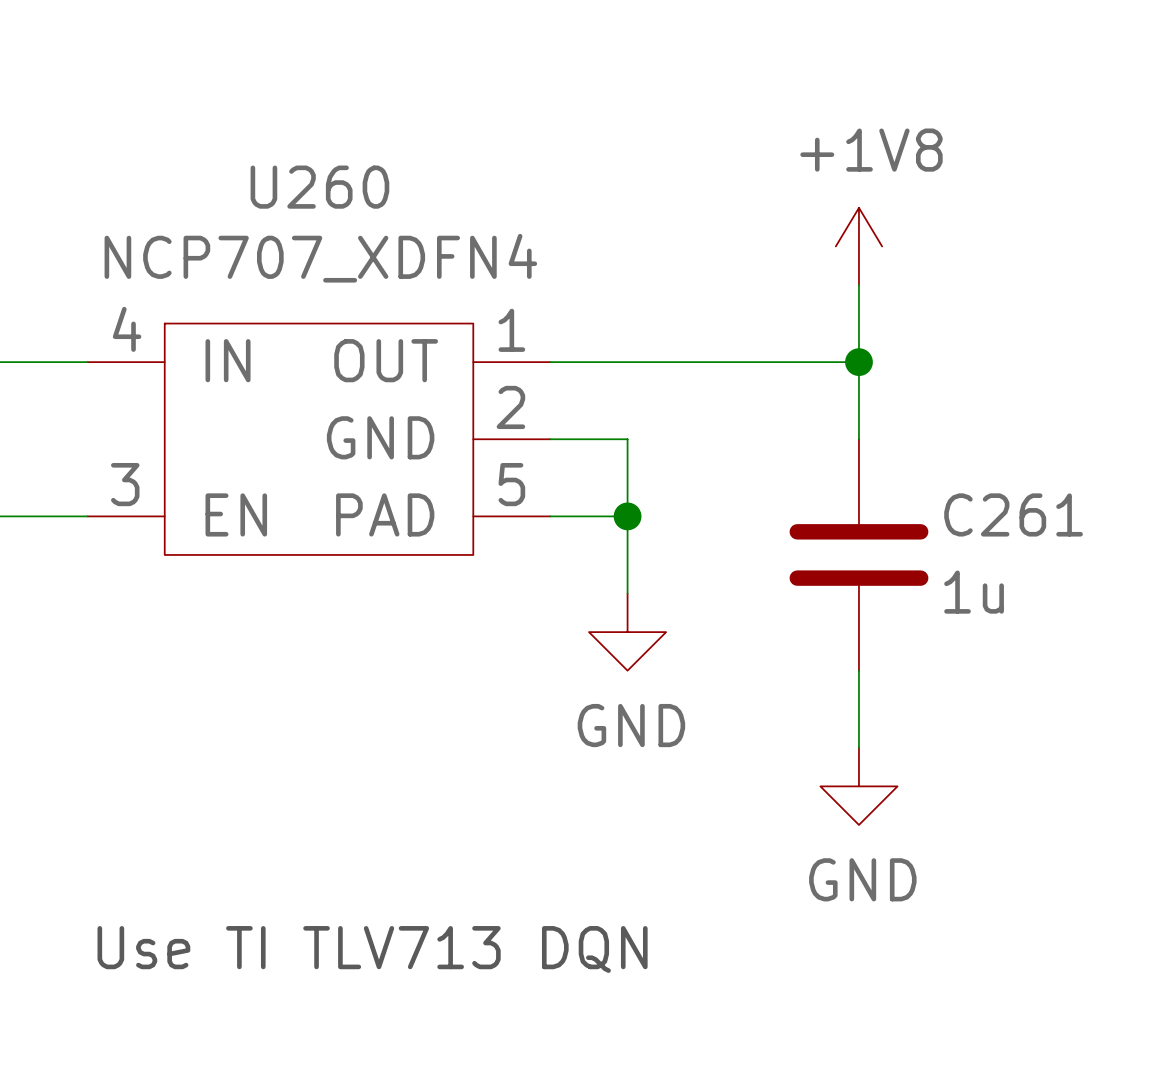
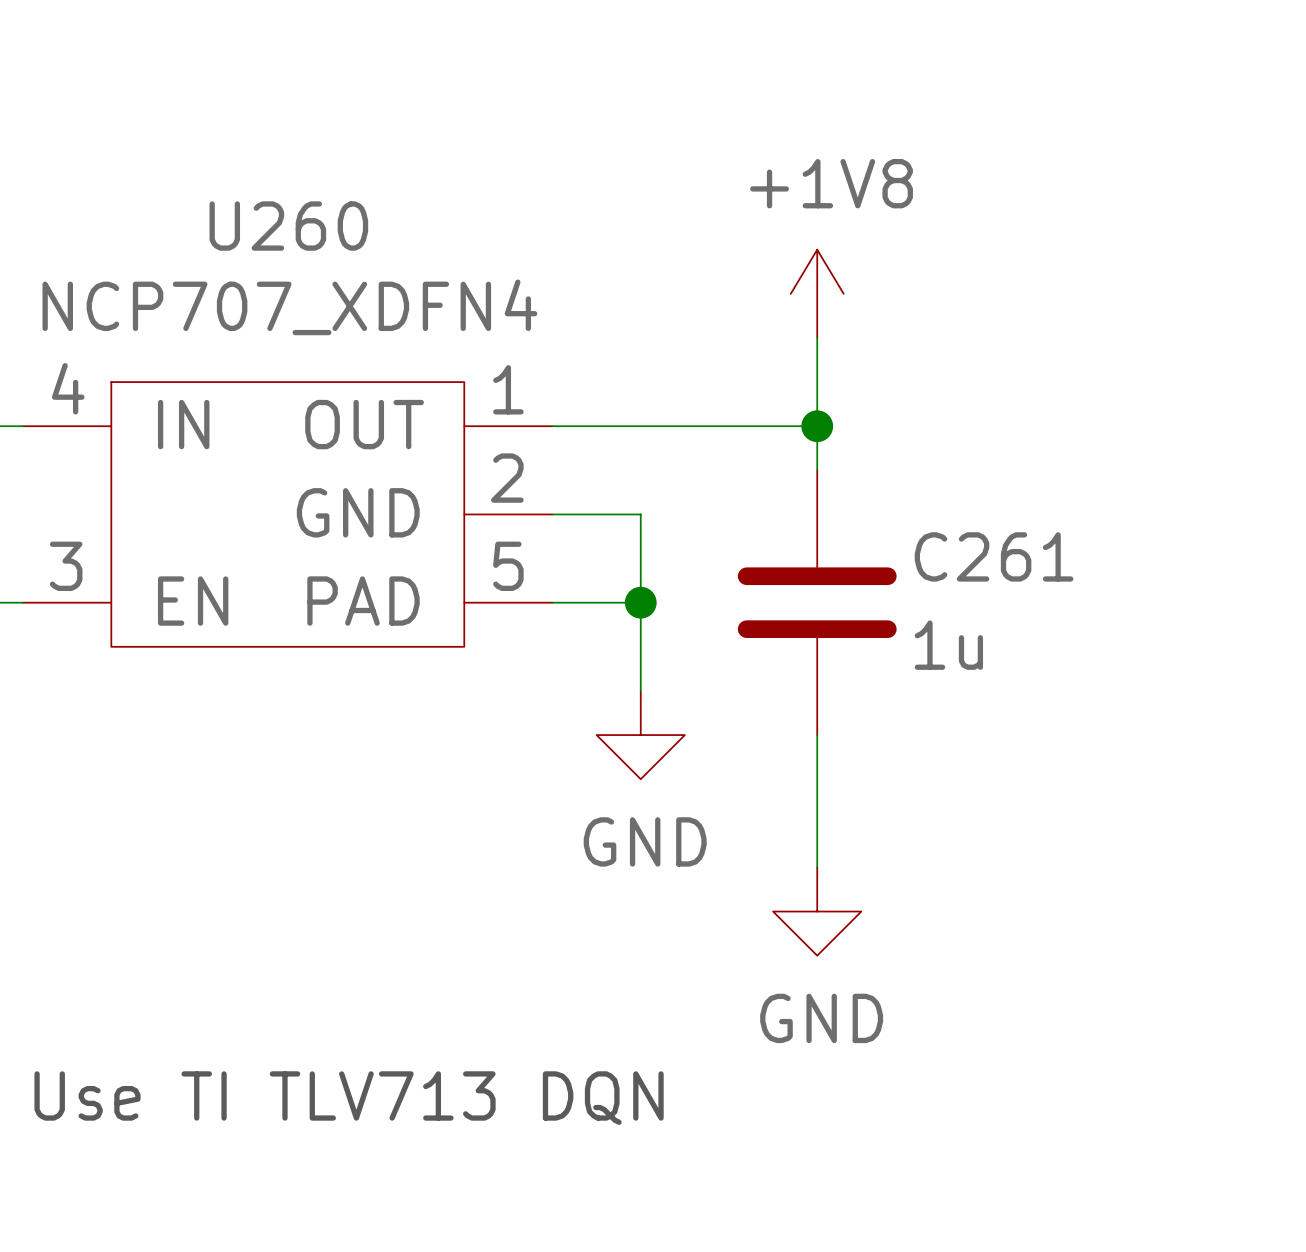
power symbol position: +1V8 (858, 246) -> +1V8 (817, 293)
wire: none -> (817, 337) (817, 470)
wire: (858, 284) (858, 439) -> none
wire: (781, 362) (858, 362) -> none
junction position: (858, 362) -> (817, 426)
C261 position: (858, 554) -> (817, 602)
wire: none -> (817, 735) (817, 867)
wire: (858, 670) (858, 747) -> none
power symbol position: GND (858, 786) -> GND (817, 911)

